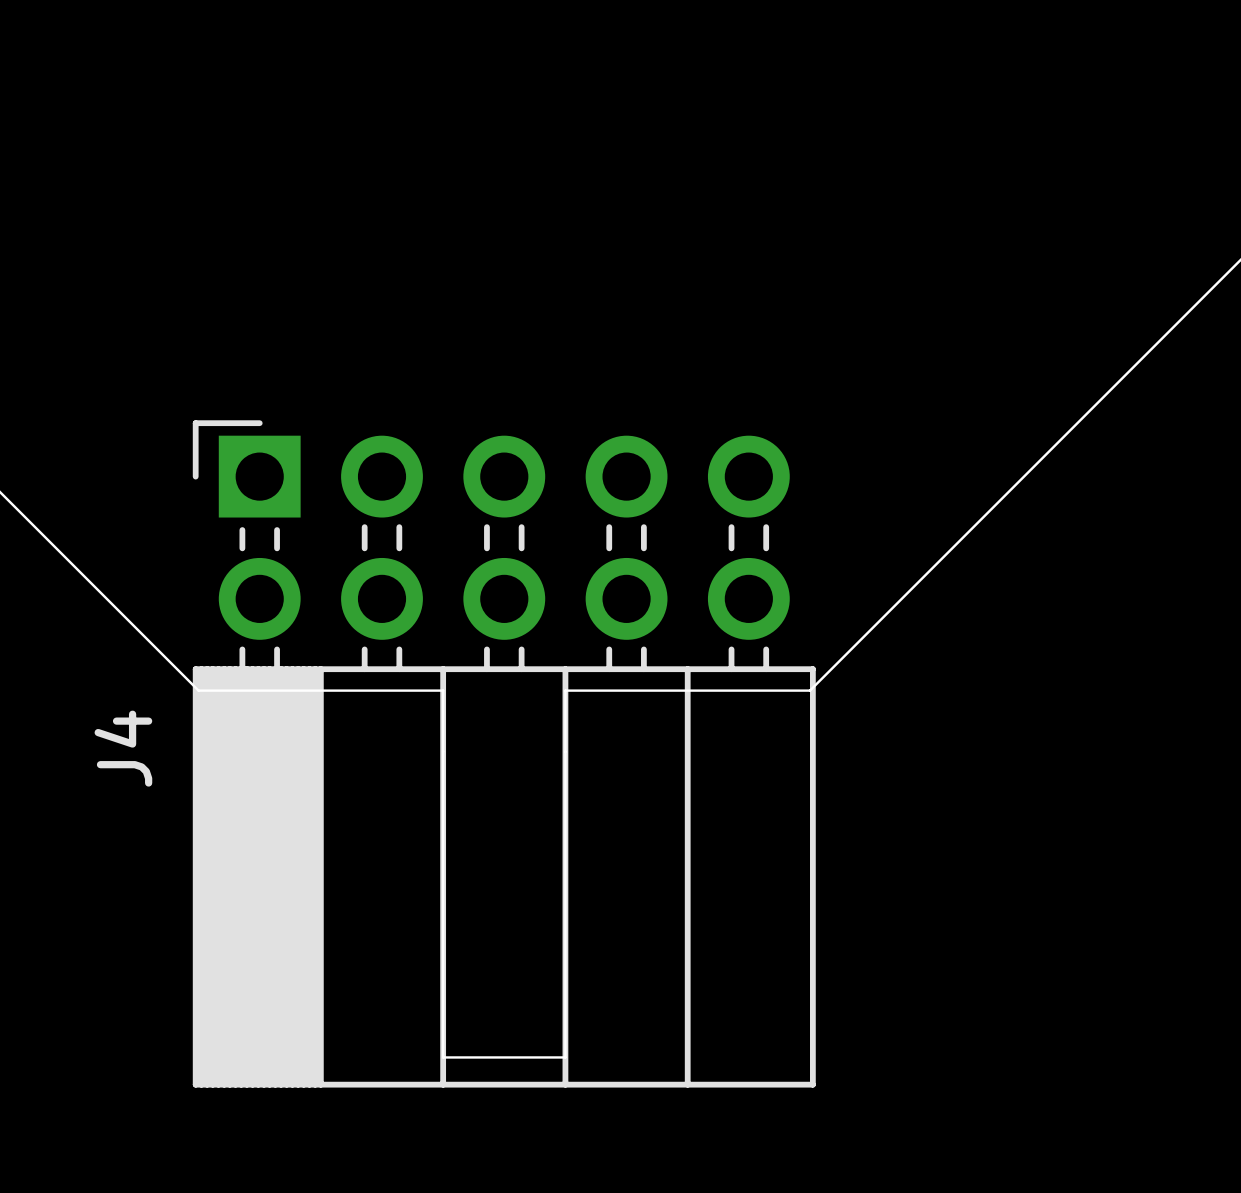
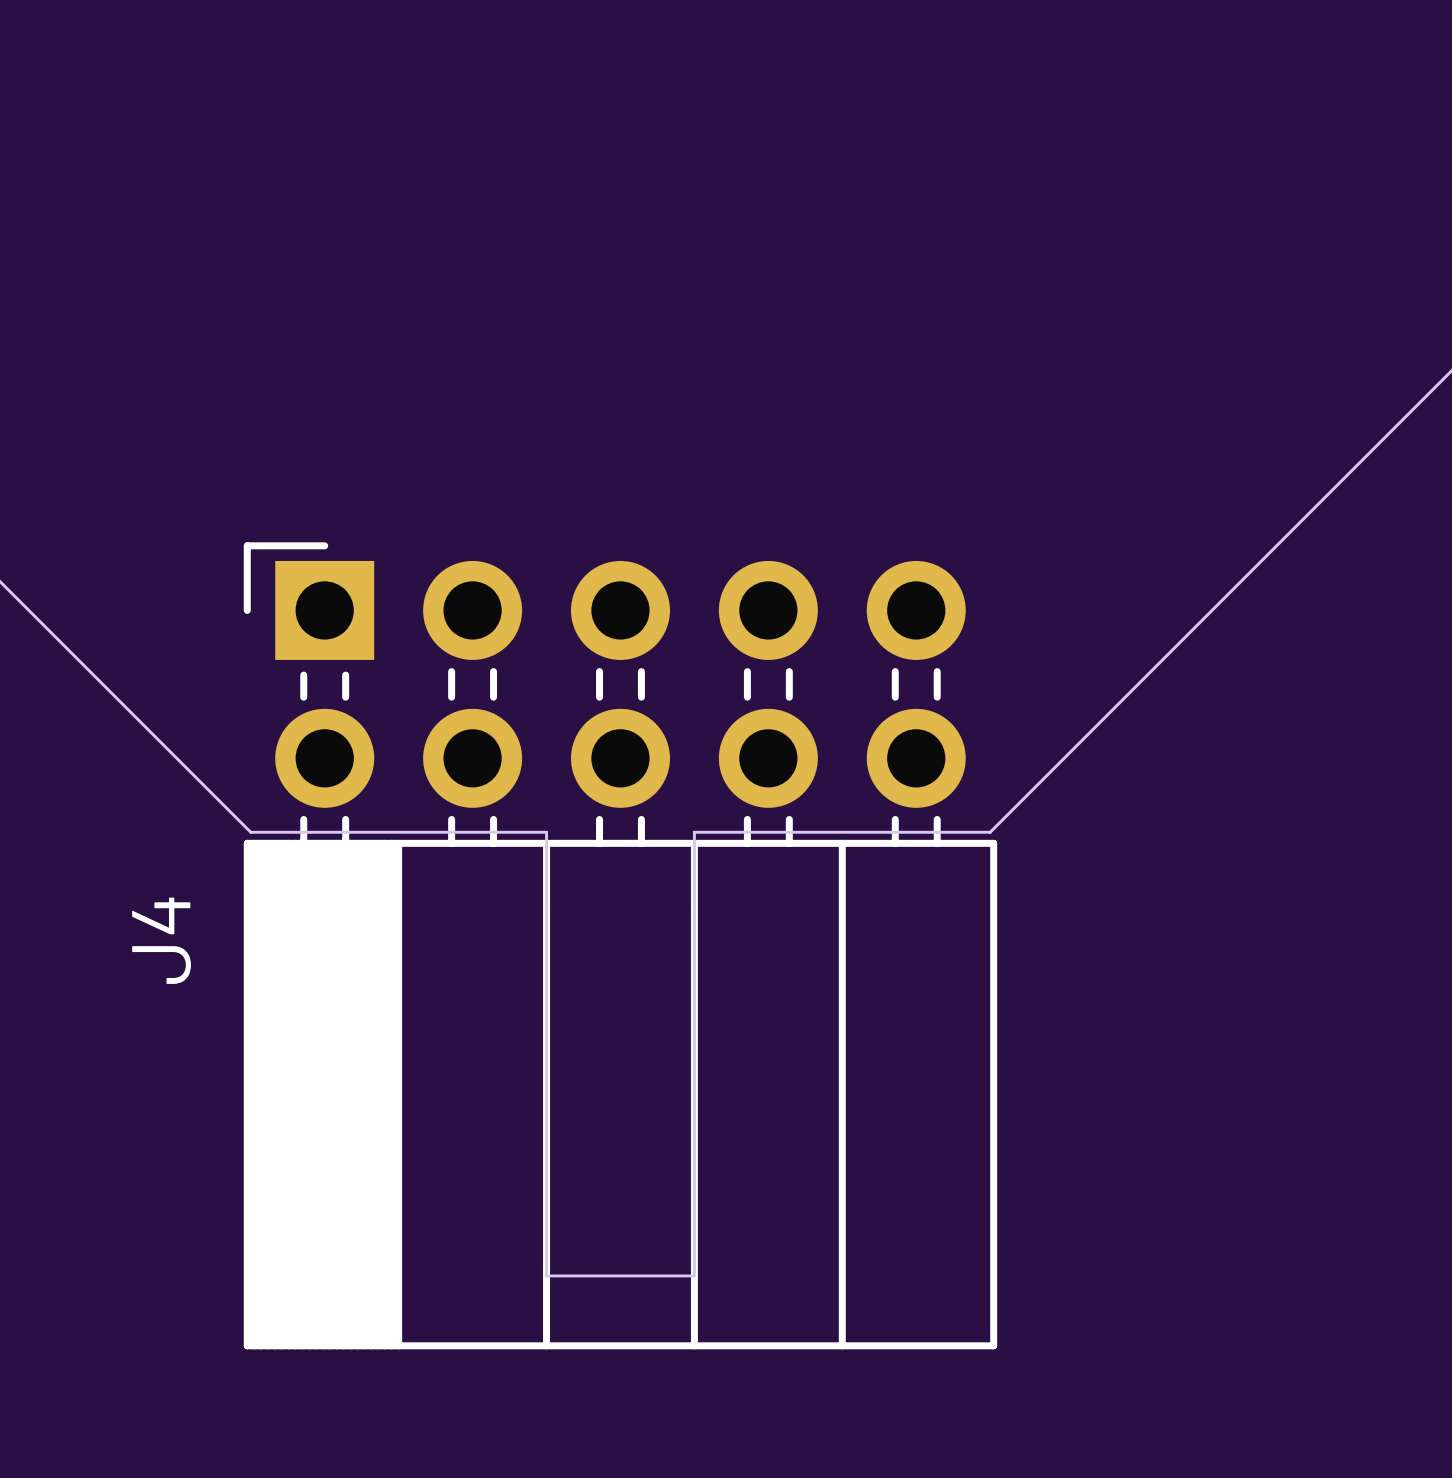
J4 position: (504, 753) -> (620, 945)

